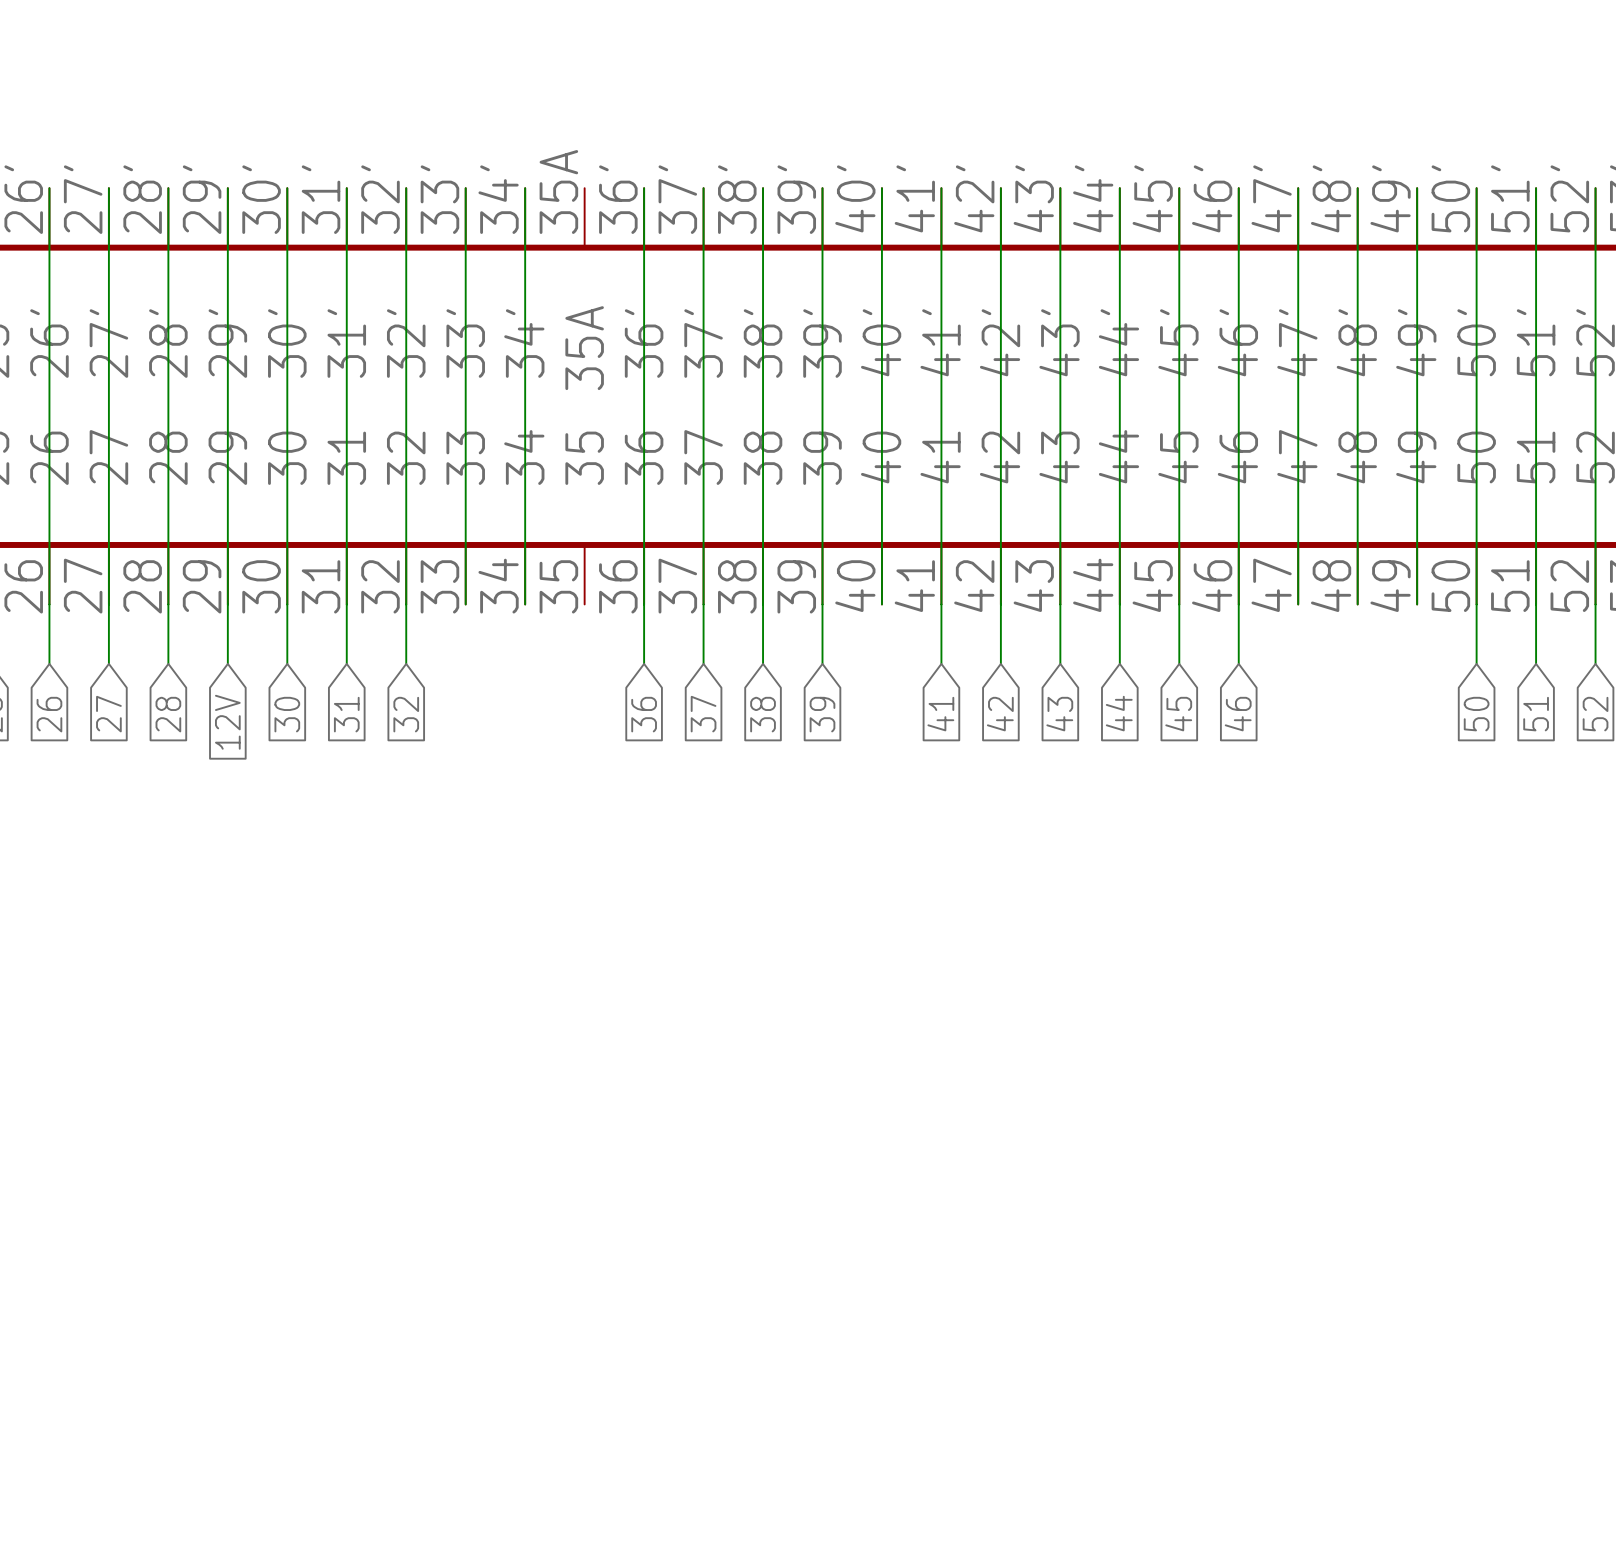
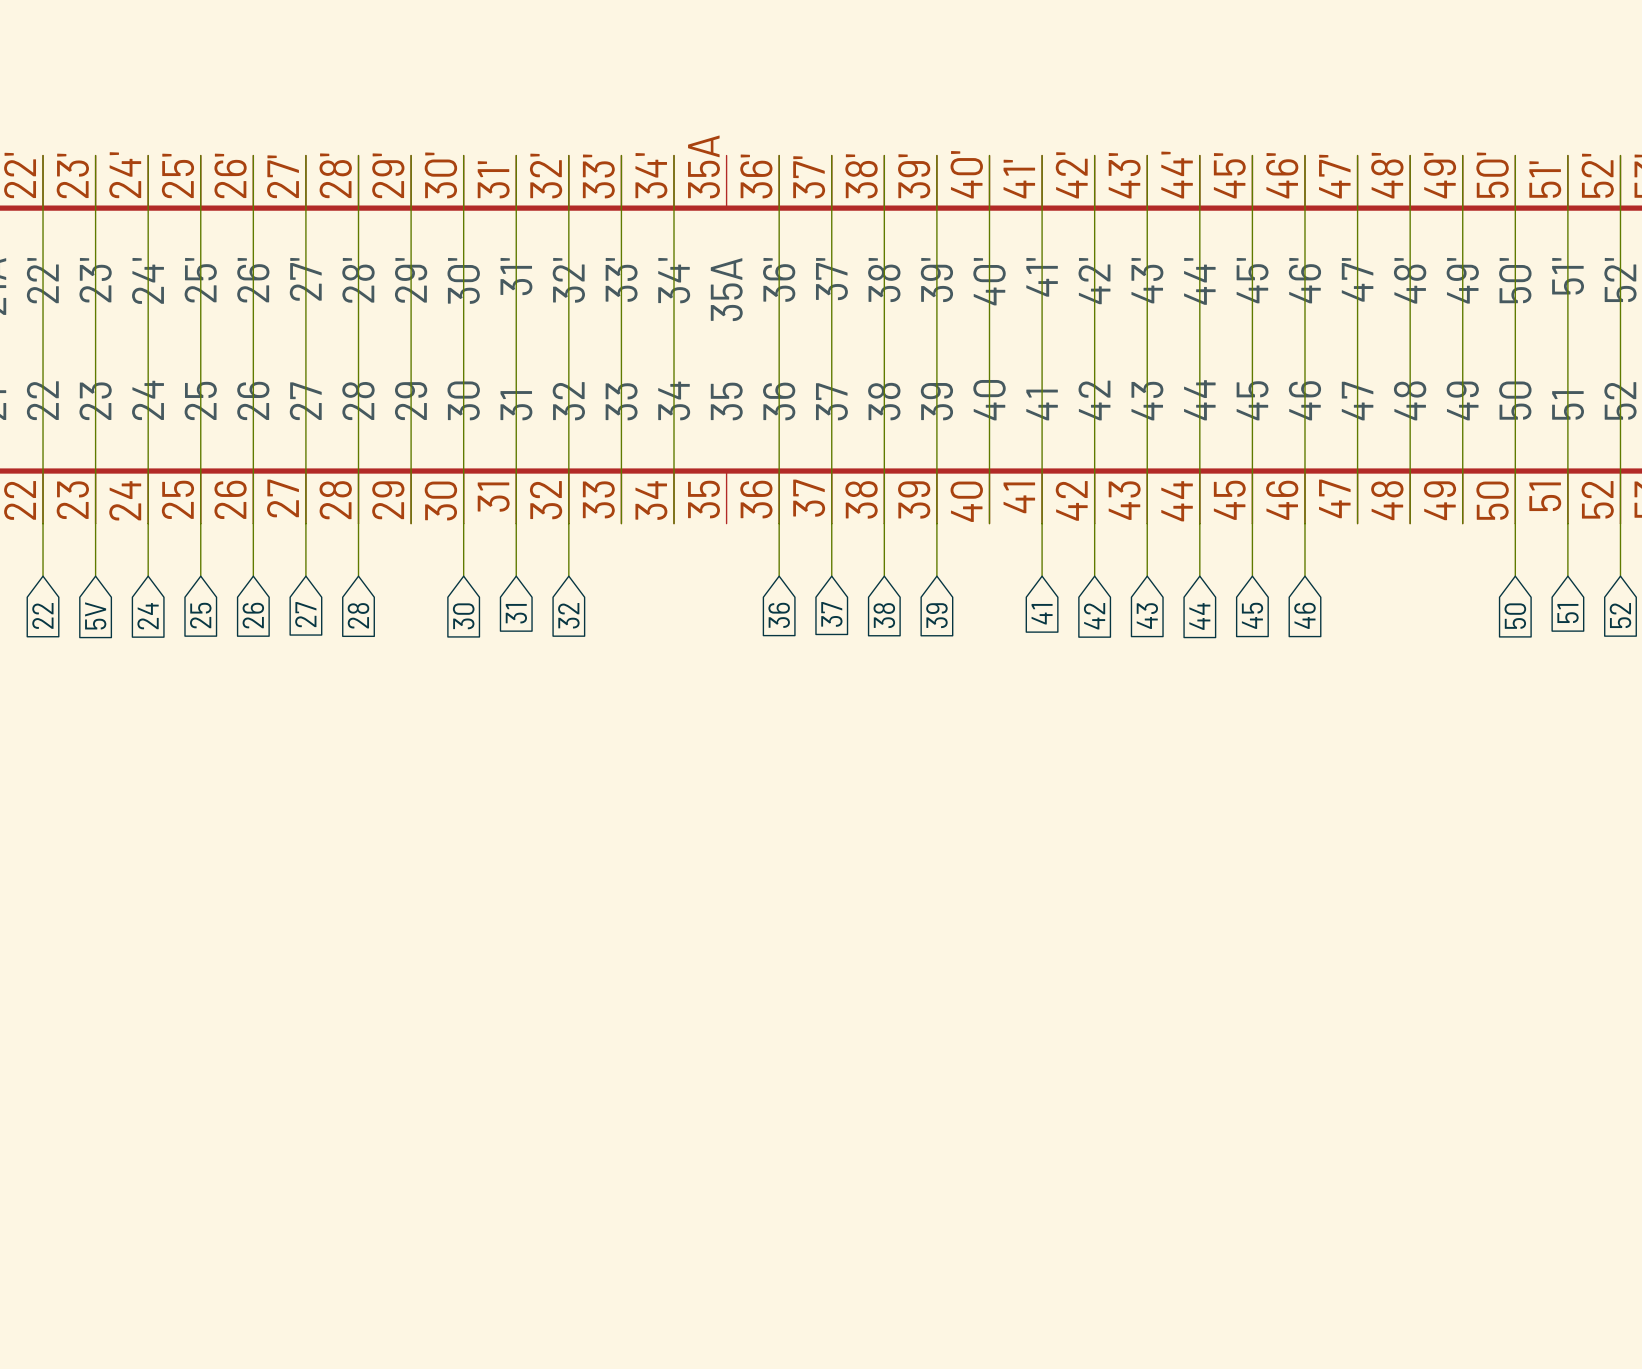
wire: (227, 604) (227, 663) -> none
global label: 12V (227, 722) -> none

